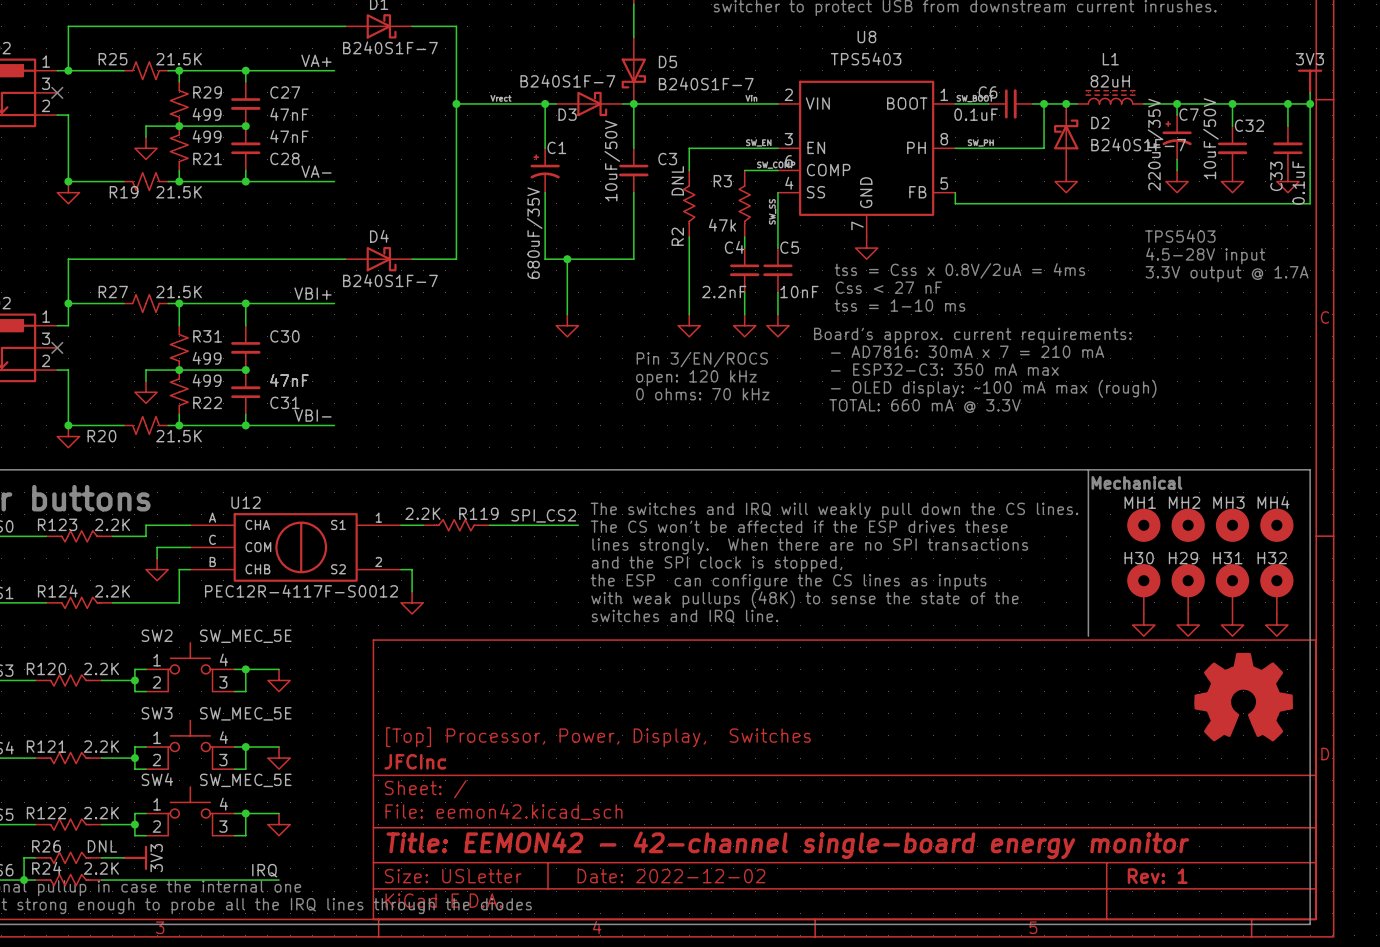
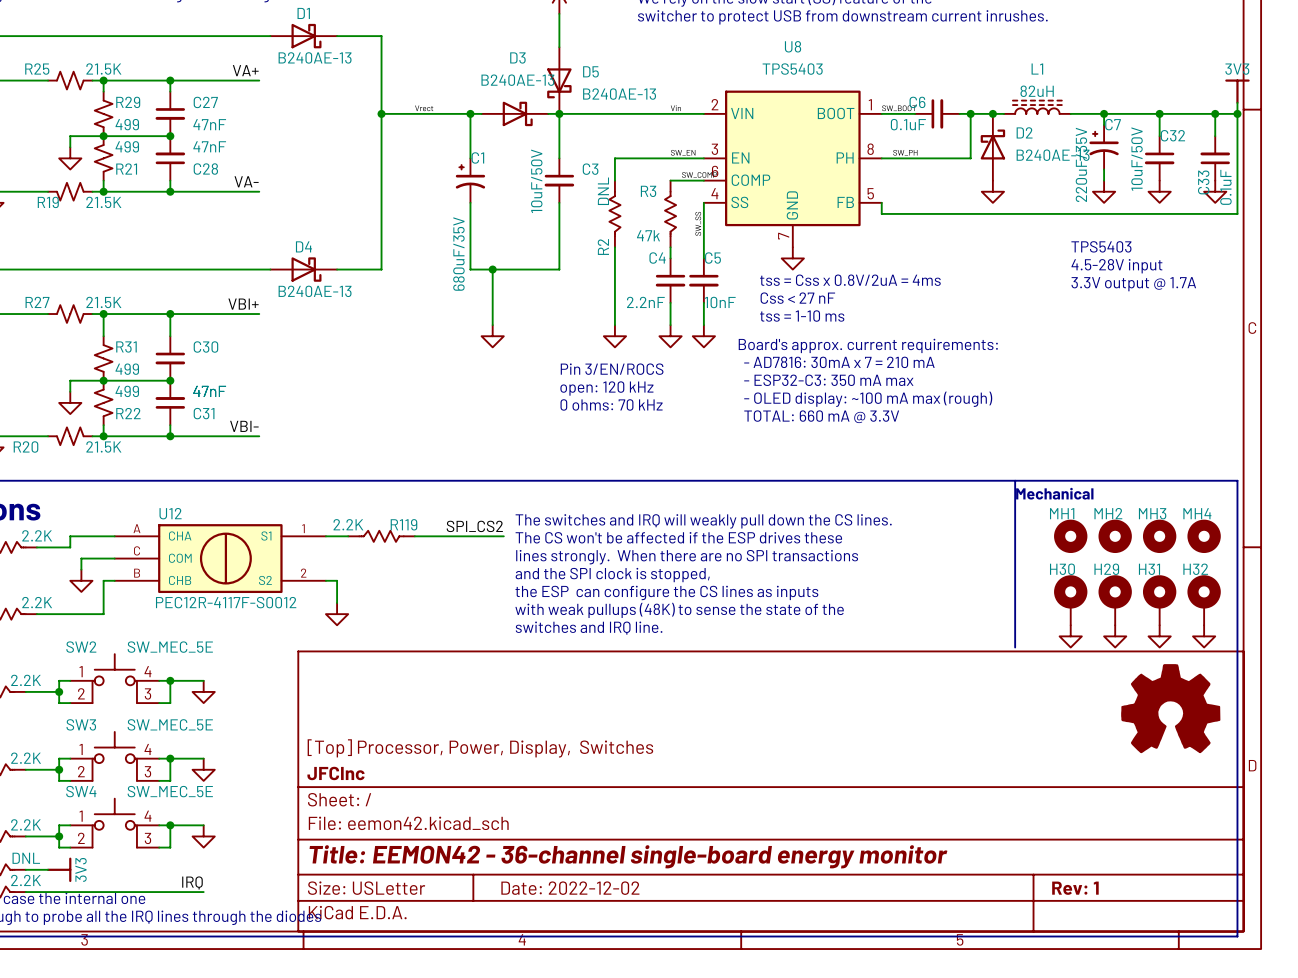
D1 value: B240S1F-7 (390, 47) -> B240AE-13 (315, 57)
D3 value: B240S1F-7 (567, 81) -> B240AE-13 (517, 80)
D5 value: B240S1F-7 (706, 83) -> B240AE-13 (619, 94)
D3 name position: D3 (567, 114) -> D3 (517, 57)
D2 value: B240S1F-7 (1138, 144) -> B240AE-13 (1053, 155)
D4 value: B240S1F-7 (390, 280) -> B240AE-13 (315, 291)
title block: Title: EEMON42 - 42-channel single-board energy monitor (787, 845) -> Title: EEMON42 - 36-channel single-board energy monitor (628, 856)

